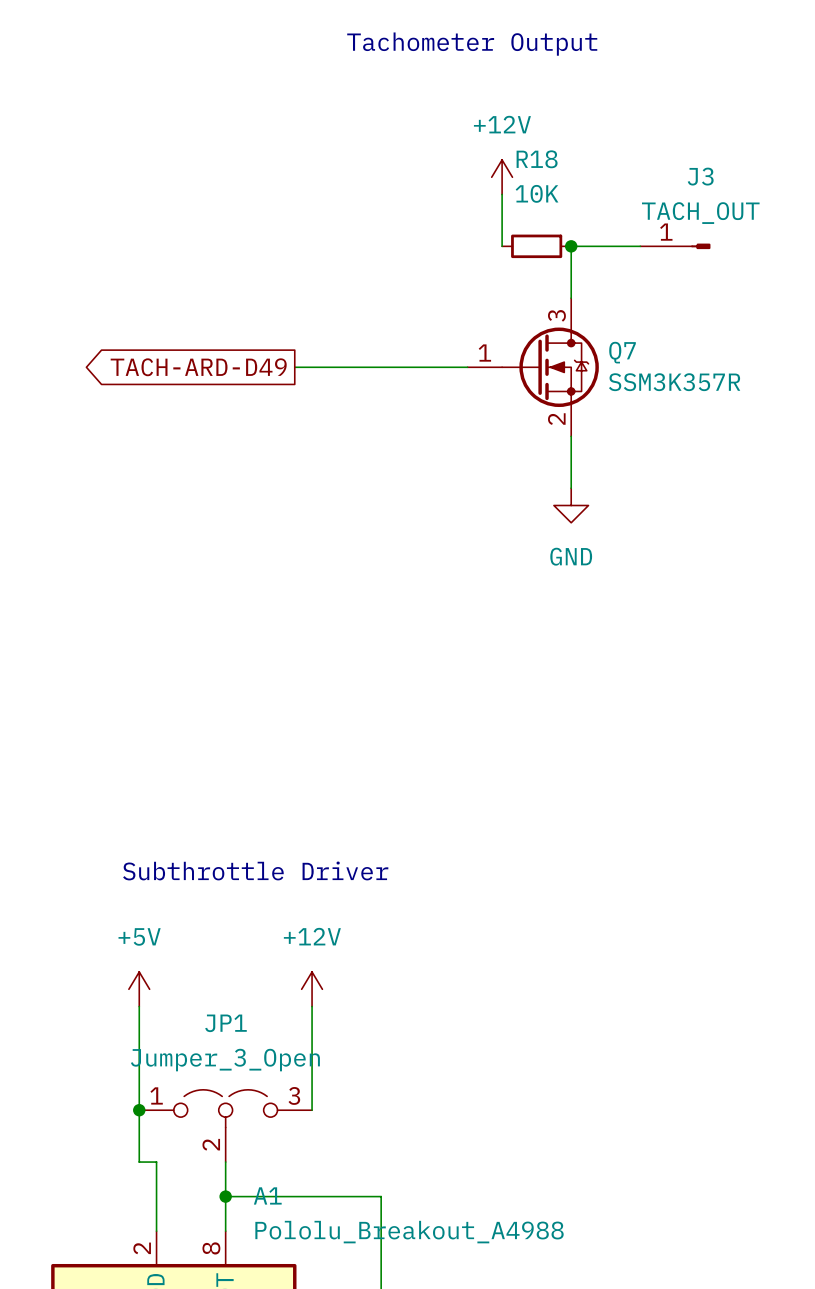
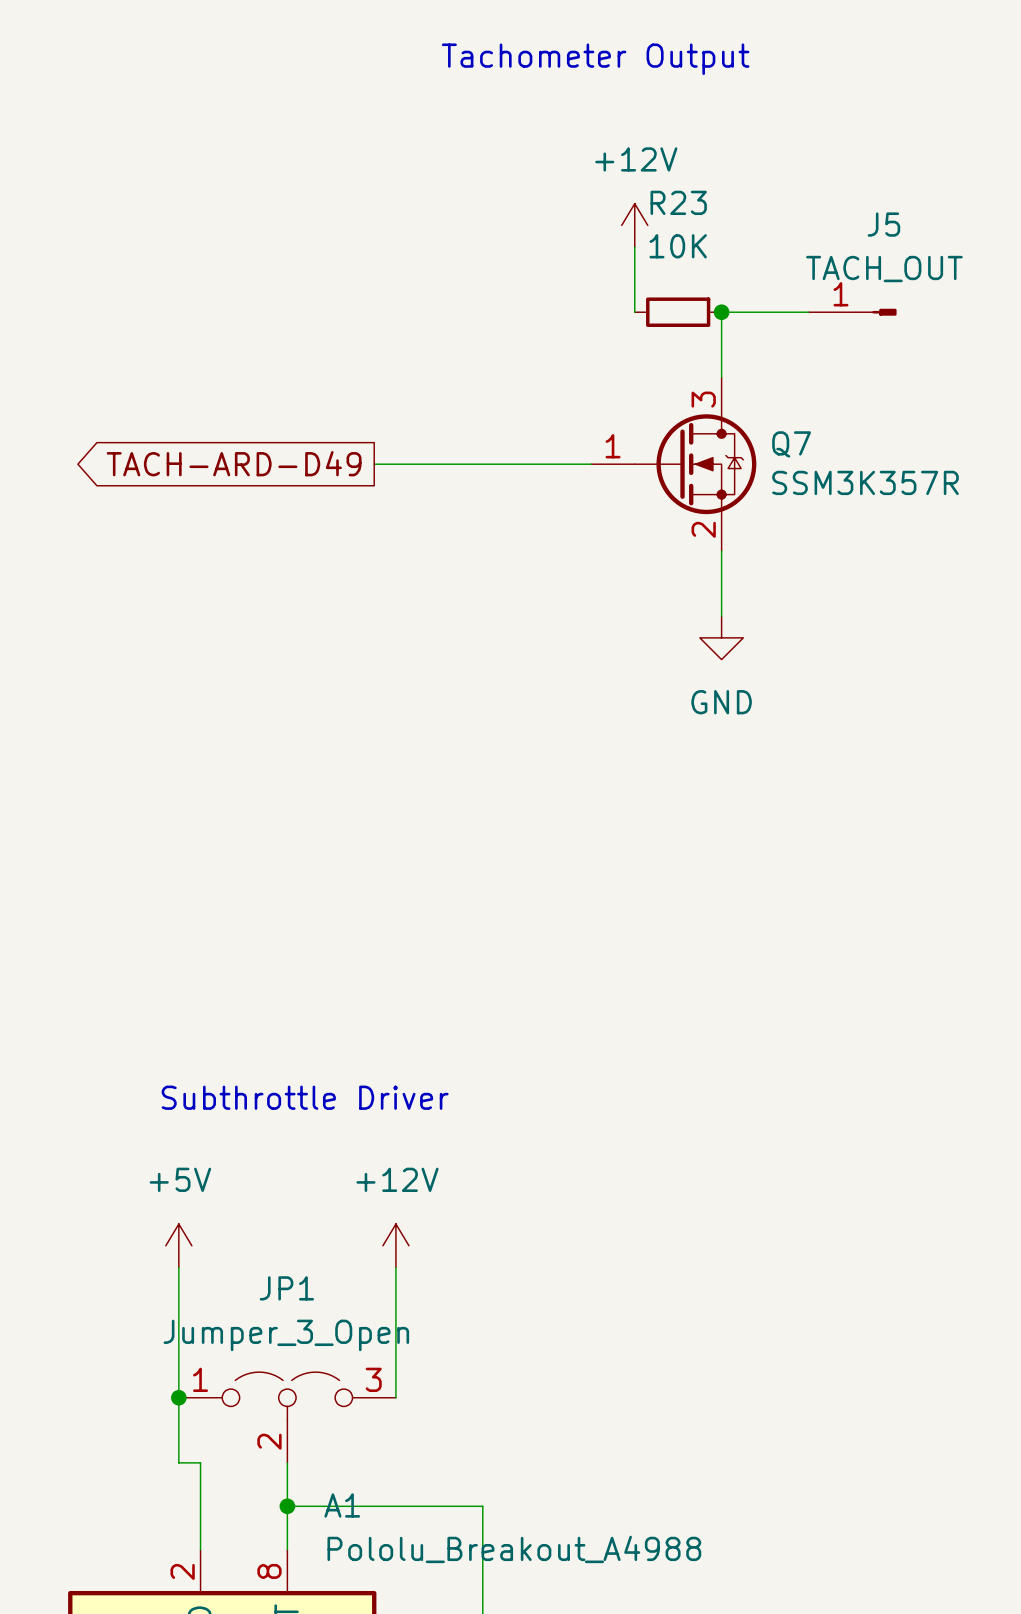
R18 name: R18 (537, 159) -> R23 (678, 202)
J3 name: J3 (700, 176) -> J5 (883, 224)

